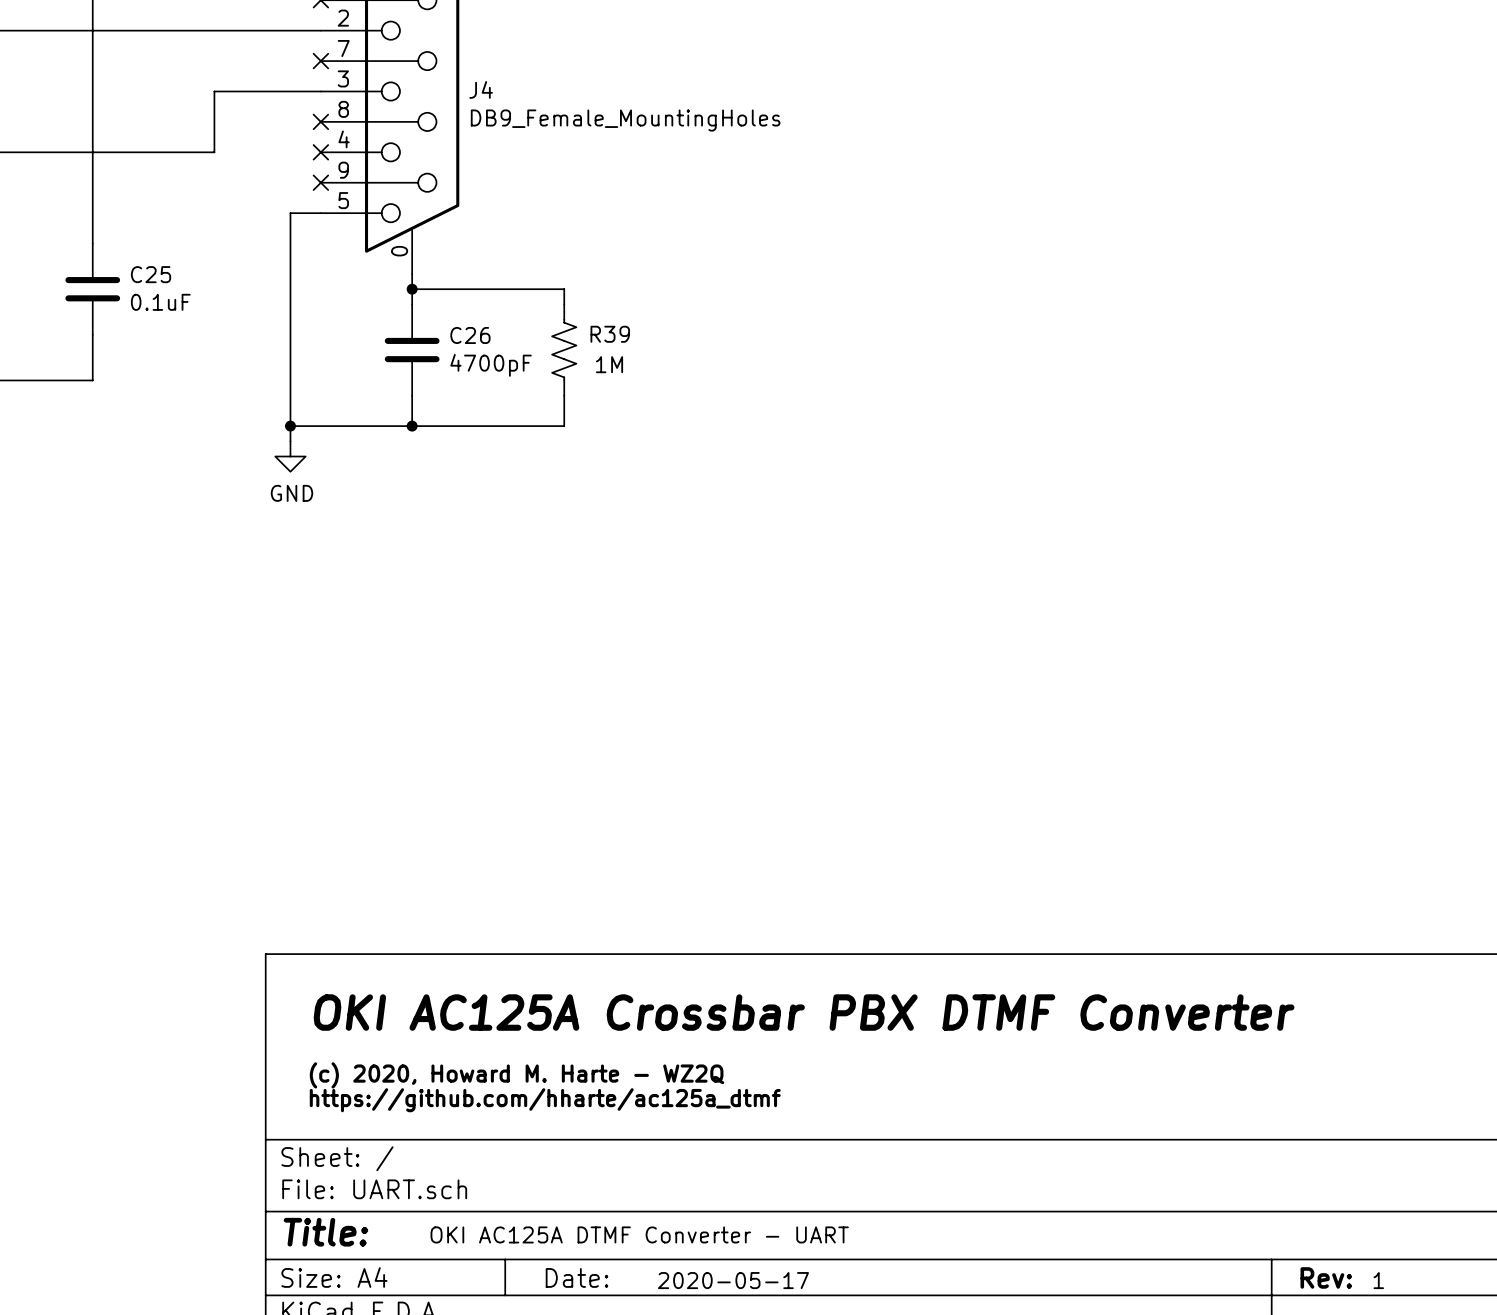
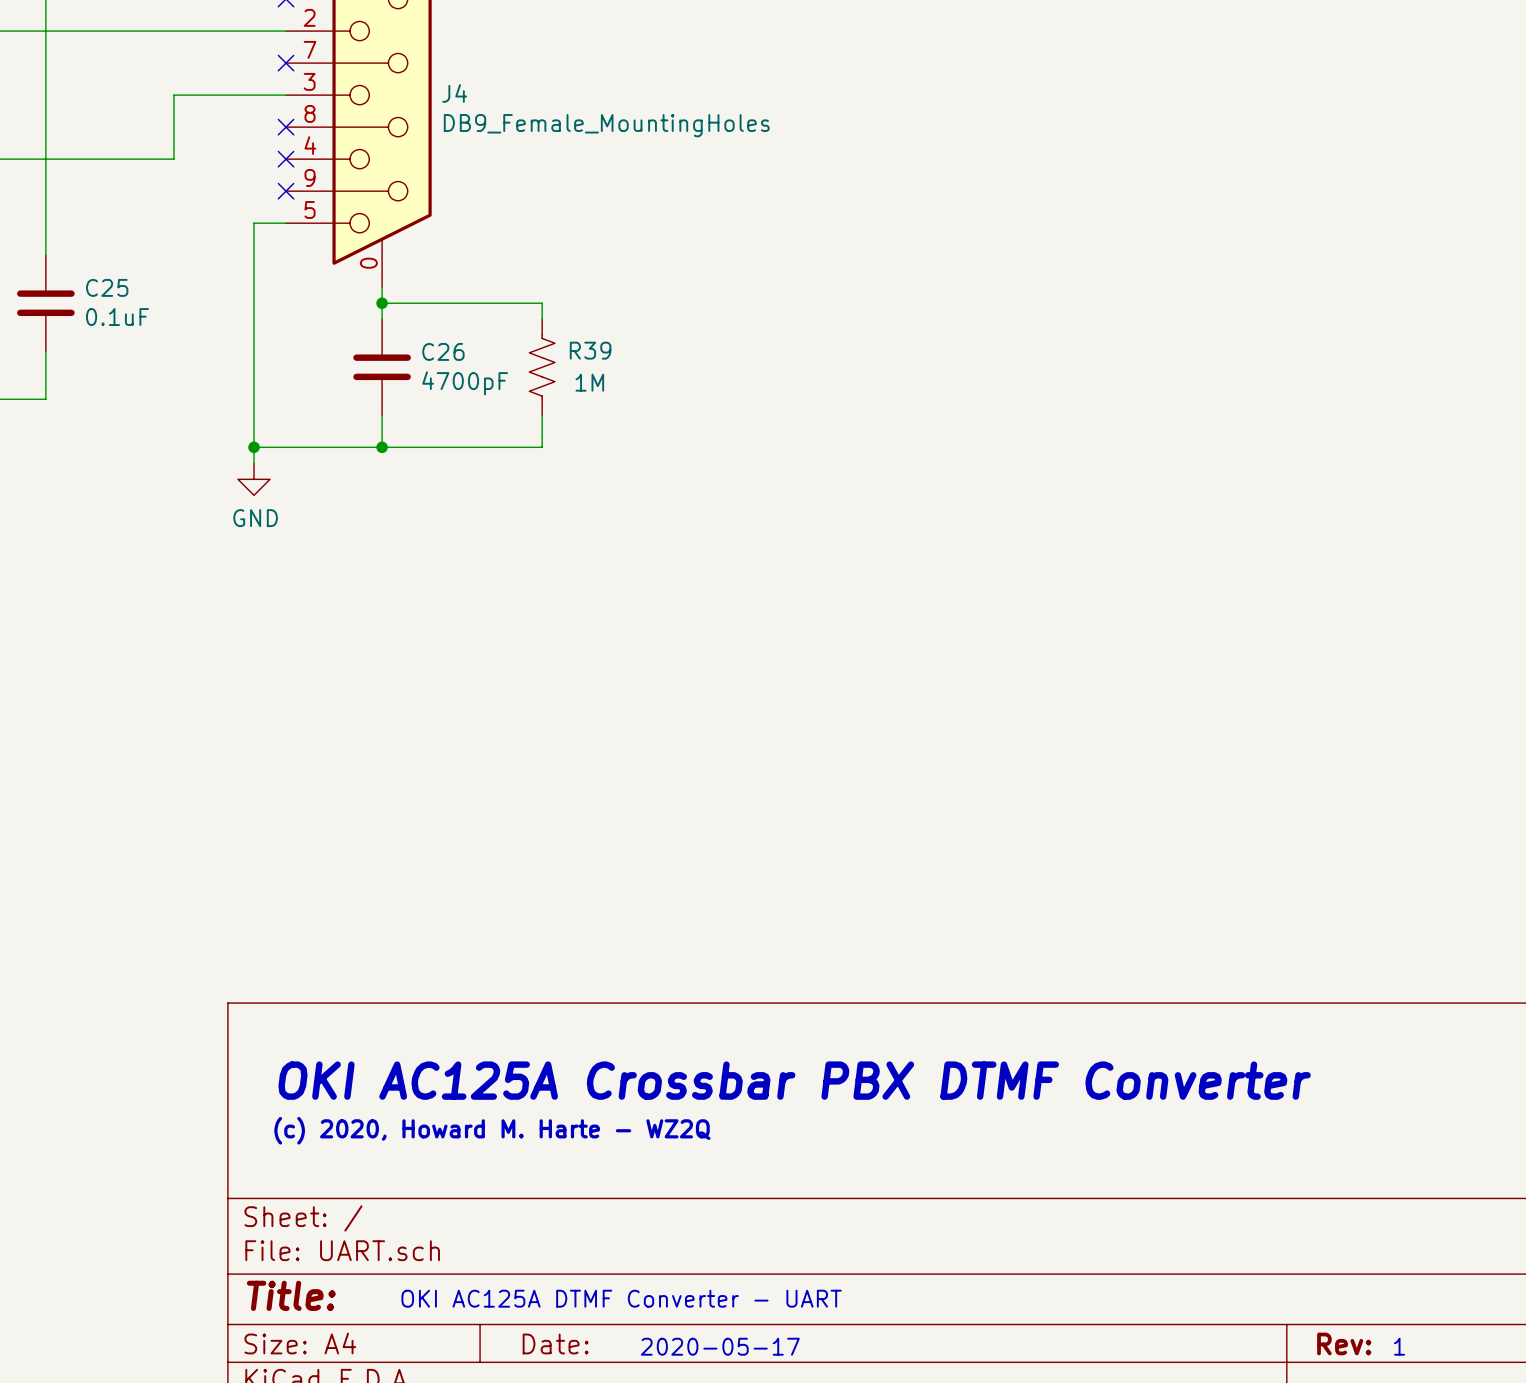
text position: OKI AC125A Crossbar PBX DTMF Converter (804, 1012) -> OKI AC125A Crossbar PBX DTMF Converter (794, 1080)
text: https://github.com/hharte/ac125a_dtmf (545, 1100) -> none

